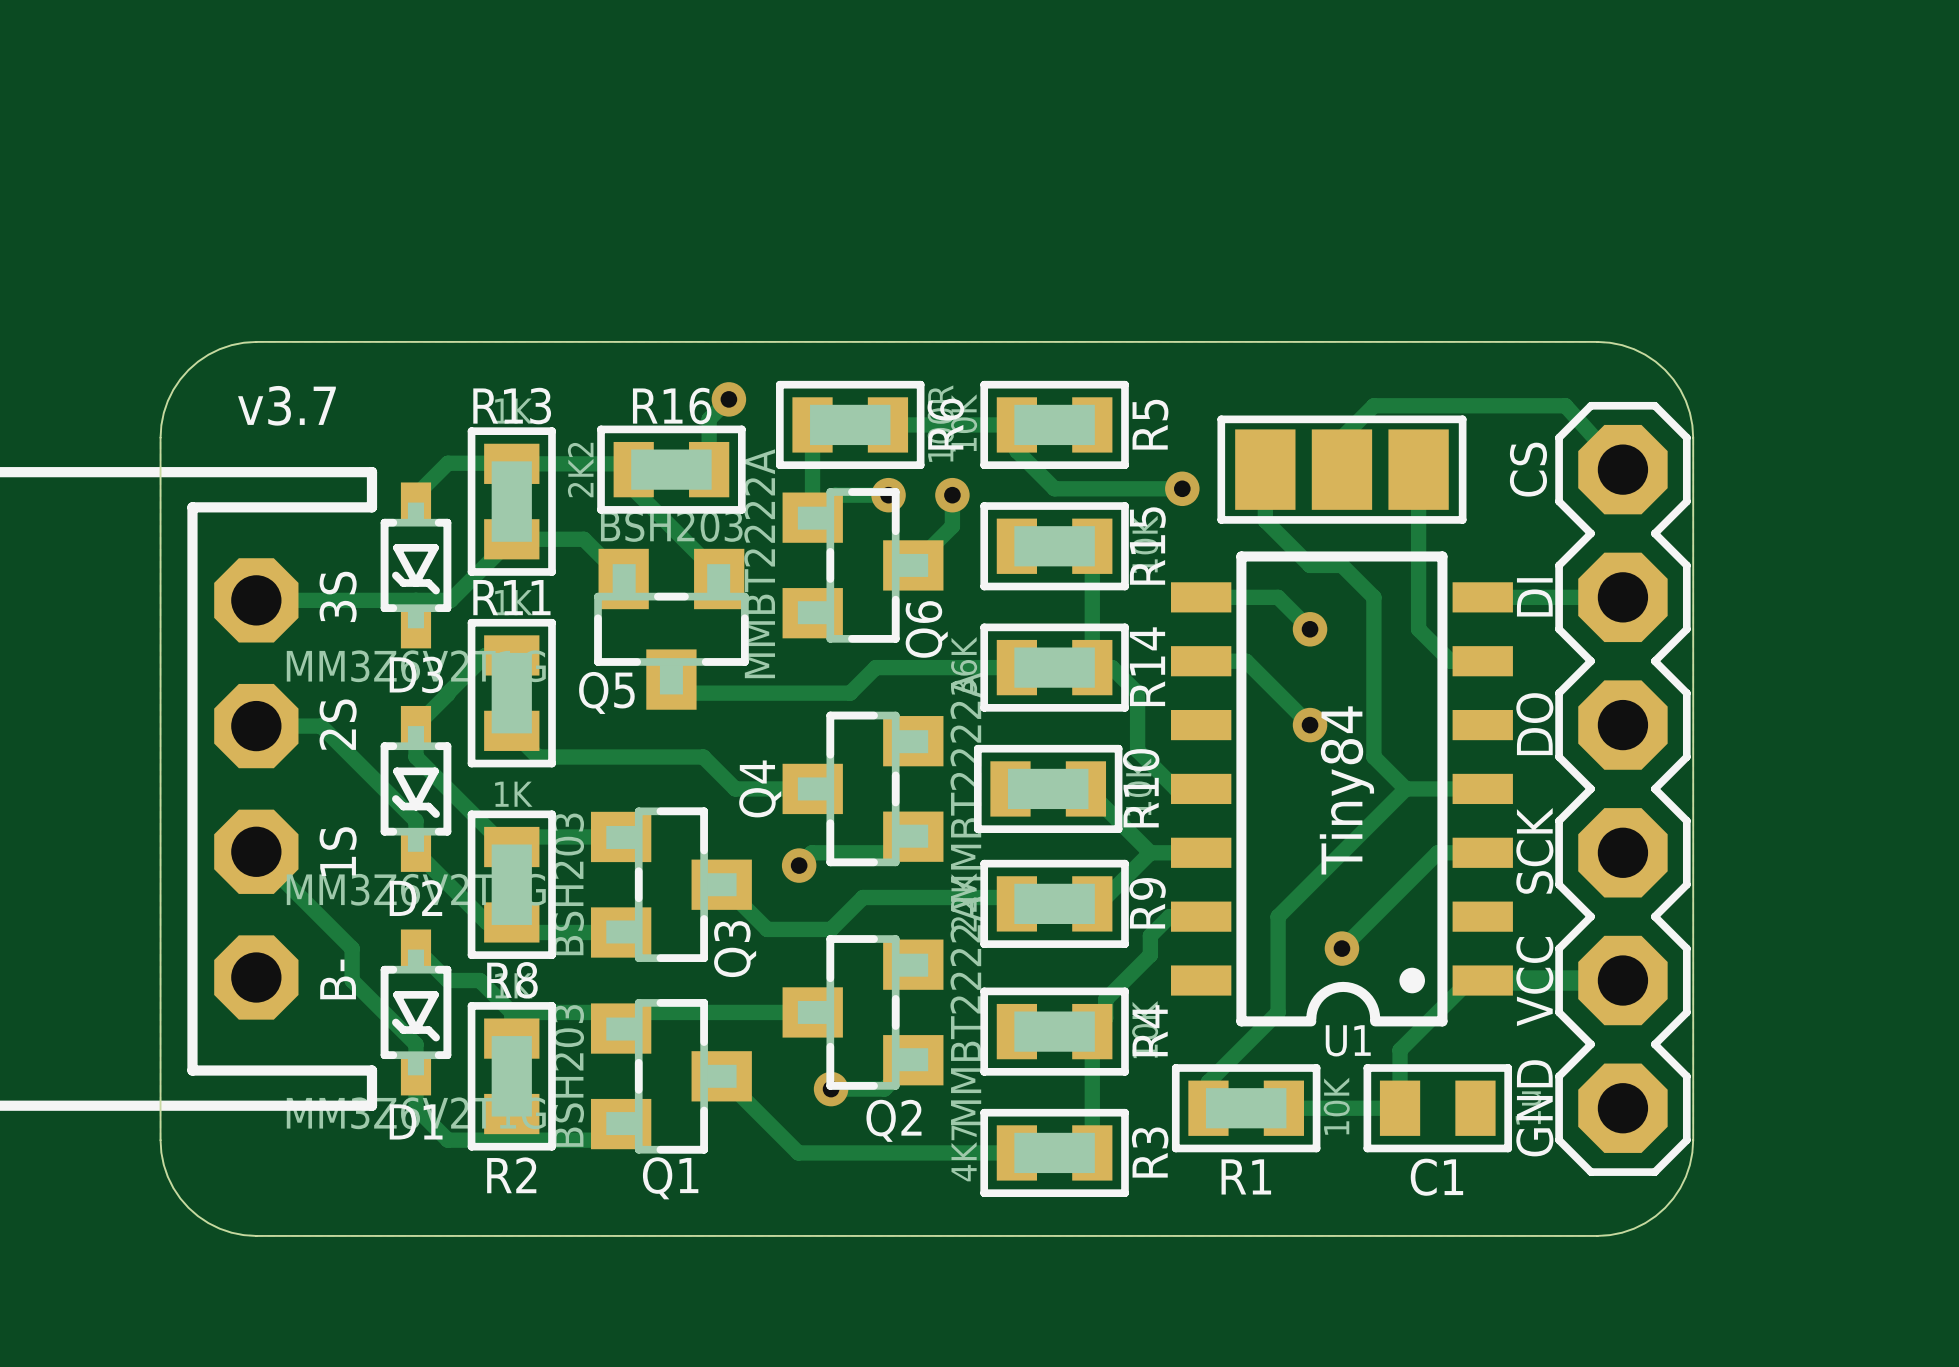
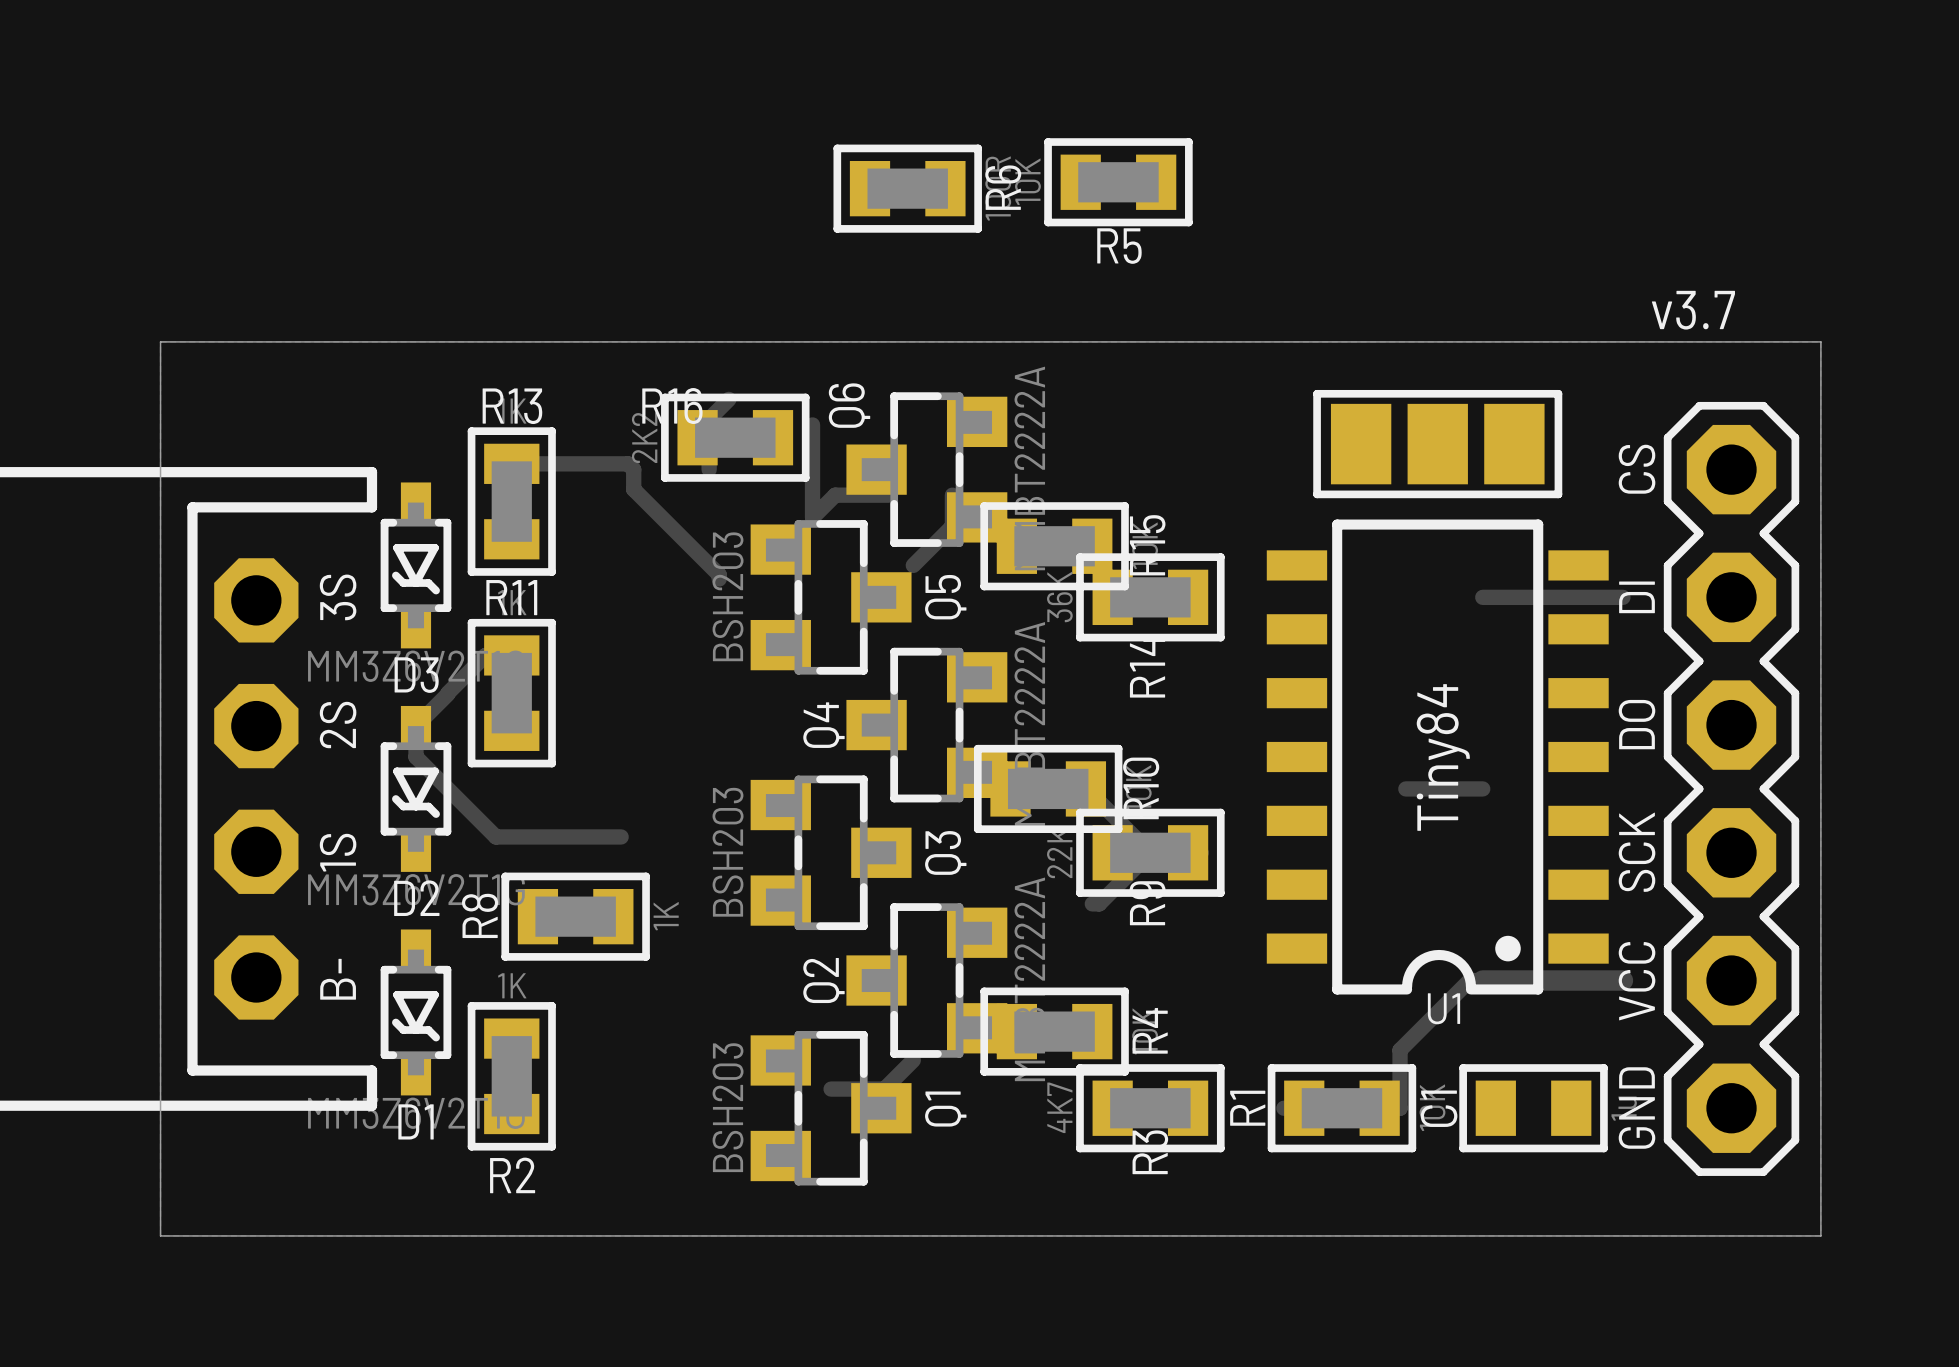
text: none -> v3.7 (1693, 310)
board edge: (256, 341) (231, 345) (219, 349) (208, 354) (188, 369) (173, 389) (167, 401) (163, 412) (160, 437) -> (256, 341) (160, 341) (160, 437)
board edge: (1597, 341) (1622, 345) (1634, 349) (1645, 354) (1665, 369) (1680, 389) (1685, 401) (1689, 412) (1693, 437) (1692, 1152) (1689, 1164) (1680, 1188) (1673, 1198) (1655, 1216) (1645, 1223) (1622, 1232) (1597, 1235) -> (1597, 341) (1820, 341) (1820, 1235) (1597, 1235)
via: (728, 399) -> none
text: v3.7 (286, 405) -> none
R6 position: (850, 424) -> (907, 188)
track: (887, 424) (1016, 424) (1016, 451) (1054, 488) (1182, 488) -> none
R5 position: (1054, 424) -> (1118, 182)
R5 name rotation: 0° (1150, 424) -> 90° clockwise (1119, 246)
R5 name position: R5 (1150, 424) -> R5 (1119, 246)
track: (511, 463) (447, 463) (415, 495) (415, 502) -> none
R16 position: (671, 469) -> (735, 437)
track: (1265, 469) (1265, 520) (1310, 565) (1341, 565) (1373, 597) (1373, 757) (1405, 788) (1278, 916) (1278, 1012) (1208, 1082) (1208, 1108) -> none
track: (1341, 469) (1341, 437) (1373, 405) (1565, 405) (1622, 469) -> none
part position: (1341, 469) -> (1437, 444)
track: (1418, 469) (1418, 629) (1450, 661) (1482, 661) -> none
text position: CS (1528, 469) -> CS (1637, 469)
via: (1182, 488) -> none
via: (888, 495) -> none
via: (952, 495) -> none
track: (1092, 546) (1092, 667) (1112, 667) (1137, 693) (1137, 750) (1175, 788) (1201, 788) -> none
Q6 rotation: 0° (863, 565) -> 180° (926, 469)
Q6 position: (863, 565) -> (926, 469)
track: (623, 579) (583, 539) (511, 539) (450, 600) (256, 600) -> none
track: (1201, 597) (1278, 597) (1310, 629) -> none
text position: DI (1534, 597) -> DI (1637, 597)
Q5 rotation: 0° (671, 629) -> 90° counterclockwise (831, 597)
Q5 position: (671, 629) -> (831, 597)
via: (1310, 629) -> none
track: (1201, 661) (1246, 661) (1310, 725) -> none
track: (1016, 667) (875, 667) (850, 693) (685, 693) (671, 679) -> none
R14 position: (1054, 667) -> (1150, 597)
text position: DO (1534, 724) -> DO (1637, 724)
via: (1310, 725) -> none
track: (256, 726) (321, 726) (415, 820) (415, 851) (486, 922) (511, 922) (521, 932) (621, 932) -> none
track: (511, 730) (537, 757) (703, 757) (735, 788) (812, 788) -> none
Q4 position: (863, 788) -> (926, 725)
U1 position: (1341, 788) -> (1437, 757)
part position: (1622, 788) -> (1731, 788)
track: (913, 836) (897, 852) (811, 852) (799, 865) -> none
text position: SCK (1534, 850) -> SCK (1637, 852)
track: (256, 852) (352, 948) (352, 980) (415, 1044) (415, 1108) (447, 1140) (605, 1140) (621, 1124) -> none
track: (1482, 852) (1437, 852) (1341, 948) -> none
via: (799, 865) -> none
R8 rotation: 0° (511, 884) -> 90° clockwise (575, 916)
Q3 position: (671, 884) -> (831, 852)
track: (722, 884) (767, 929) (831, 929) (863, 897) (1010, 897) (1016, 903) -> none
R9 position: (1054, 903) -> (1150, 852)
track: (1201, 916) (1169, 916) (1150, 935) (1150, 954) (1105, 999) (1105, 1018) (1092, 1031) (1092, 1152) -> none
via: (1341, 948) -> none
track: (416, 949) (447, 980) (479, 980) (511, 1012) -> none
Q3 name position: Q3 (735, 949) -> Q3 (945, 852)
text position: VCC (1534, 981) -> VCC (1637, 981)
track: (511, 1012) (605, 1012) (621, 1028) (637, 1012) (812, 1012) -> none
Q2 position: (863, 1012) -> (926, 980)
Q1 position: (671, 1076) -> (831, 1108)
track: (721, 1076) (798, 1152) (1016, 1152) -> none
via: (831, 1089) -> none
R1 position: (1246, 1108) -> (1341, 1108)
C1 position: (1437, 1108) -> (1533, 1108)
text position: GND (1534, 1108) -> GND (1637, 1108)
Q2 name rotation: 0° (893, 1120) -> 90° counterclockwise (823, 980)
Q2 name position: Q2 (893, 1120) -> Q2 (823, 980)
board edge: (160, 1140) (163, 1164) (167, 1176) (173, 1188) (188, 1207) (208, 1223) (219, 1228) (231, 1232) (256, 1235) -> (160, 1140) (160, 1235) (256, 1235)
R3 position: (1054, 1152) -> (1150, 1108)
R1 name rotation: 0° (1246, 1176) -> 90° counterclockwise (1247, 1108)
C1 name rotation: 0° (1436, 1177) -> 90° counterclockwise (1439, 1108)
Q1 name rotation: 0° (670, 1178) -> 90° counterclockwise (945, 1109)
Q1 name position: Q1 (670, 1178) -> Q1 (945, 1109)

